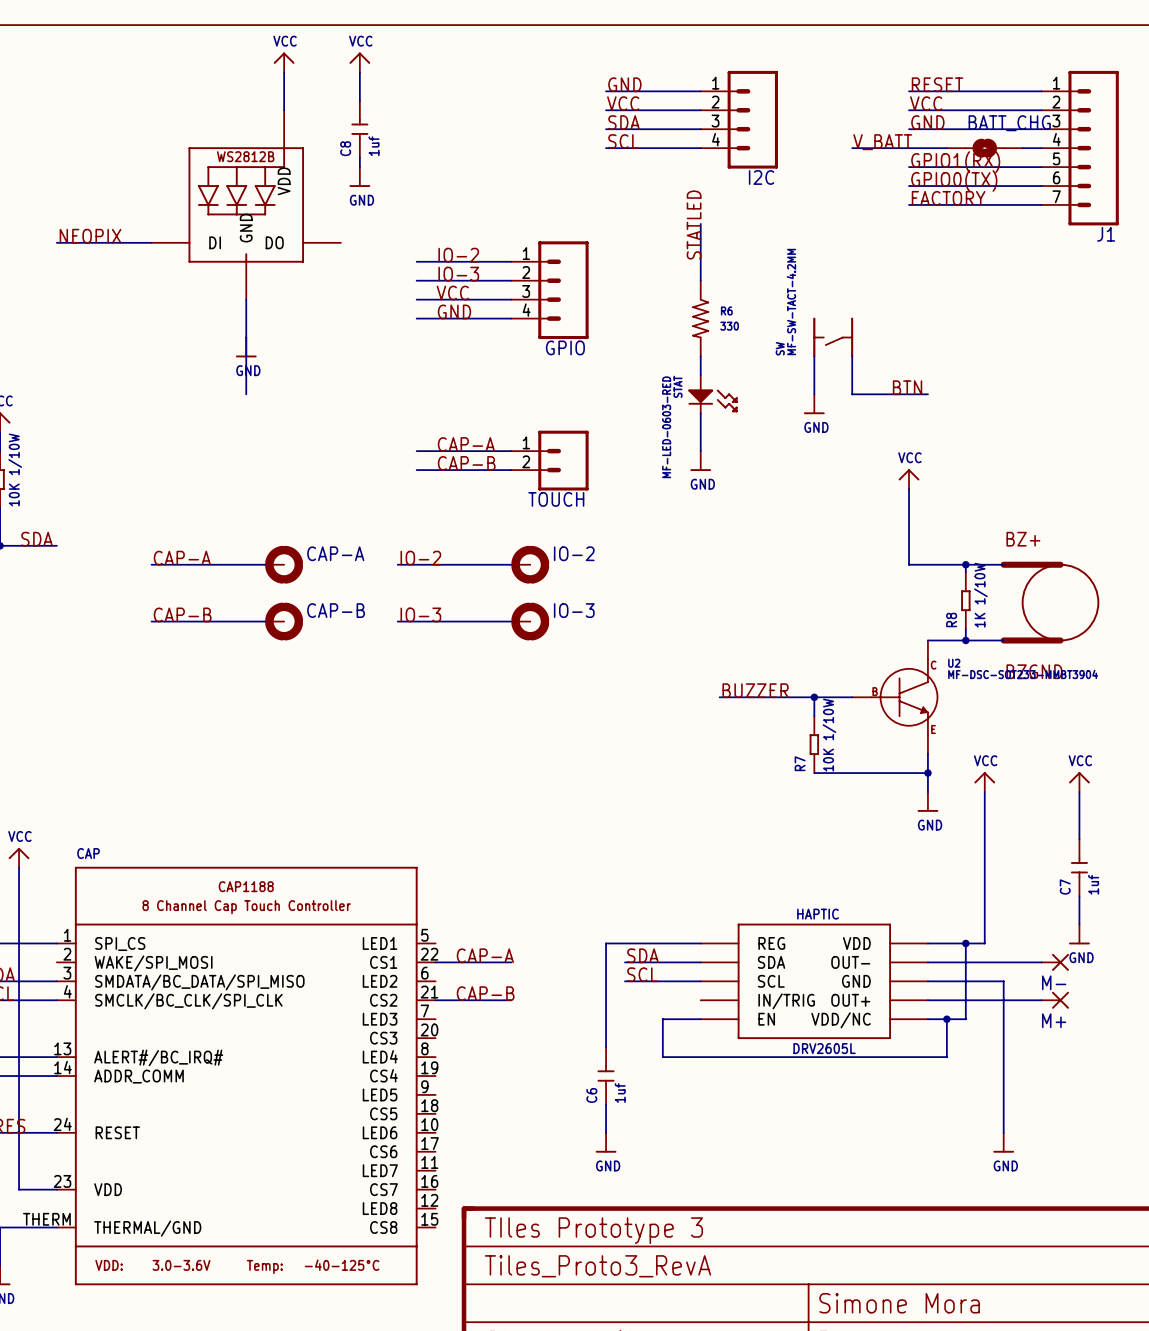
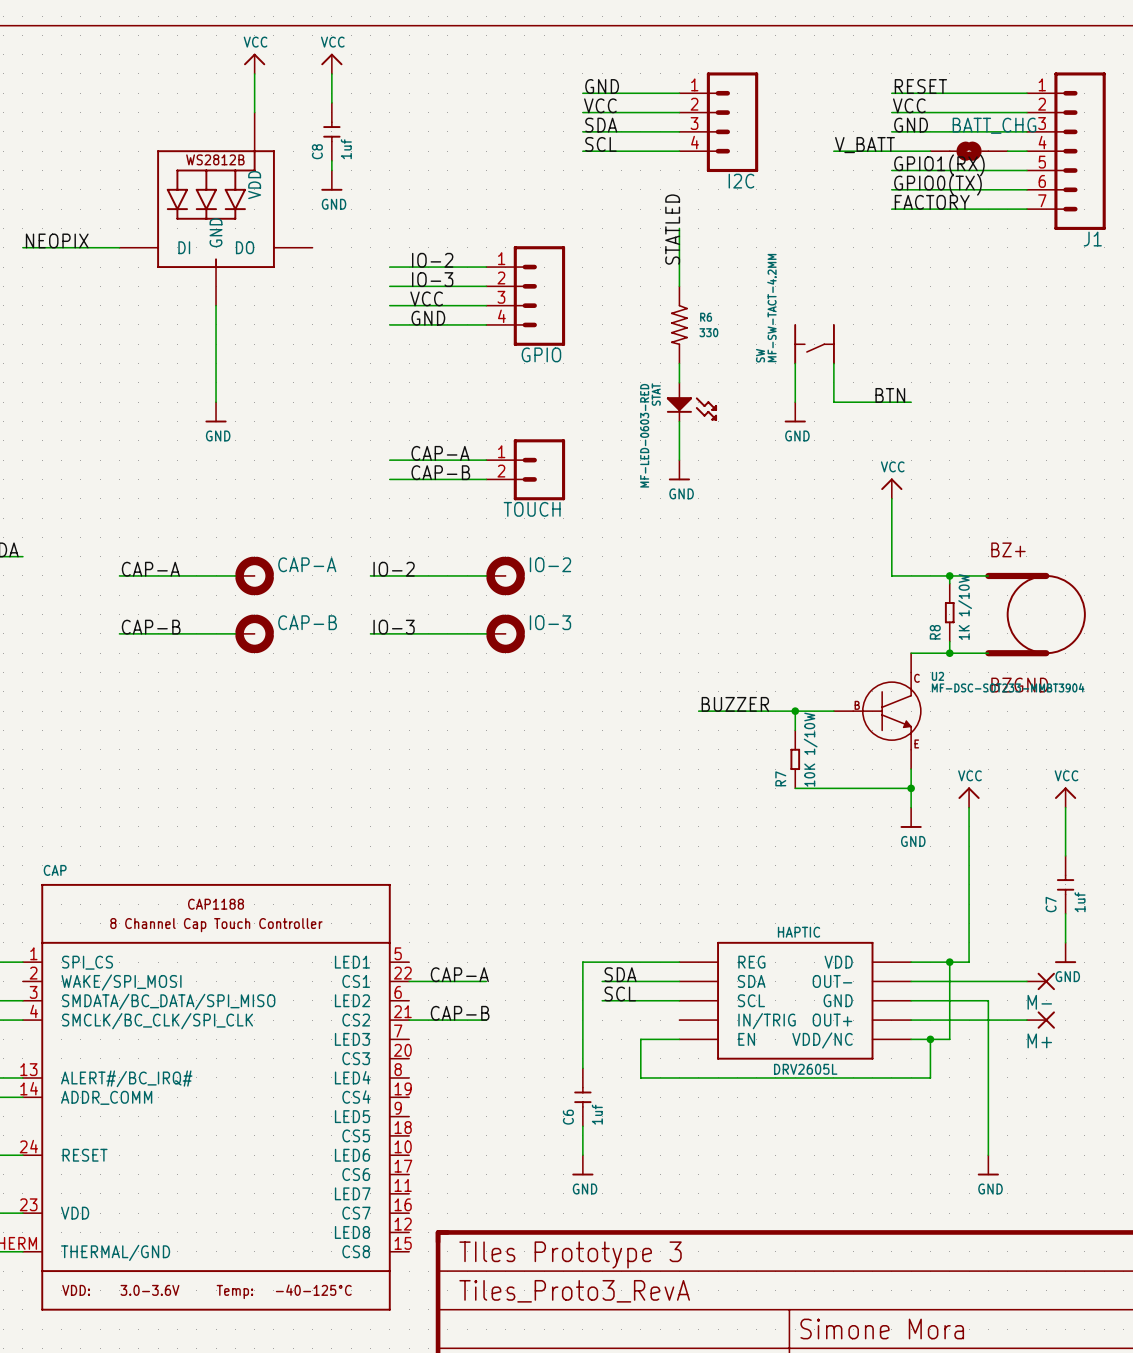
power symbol position: GND (246, 347) -> GND (216, 412)

